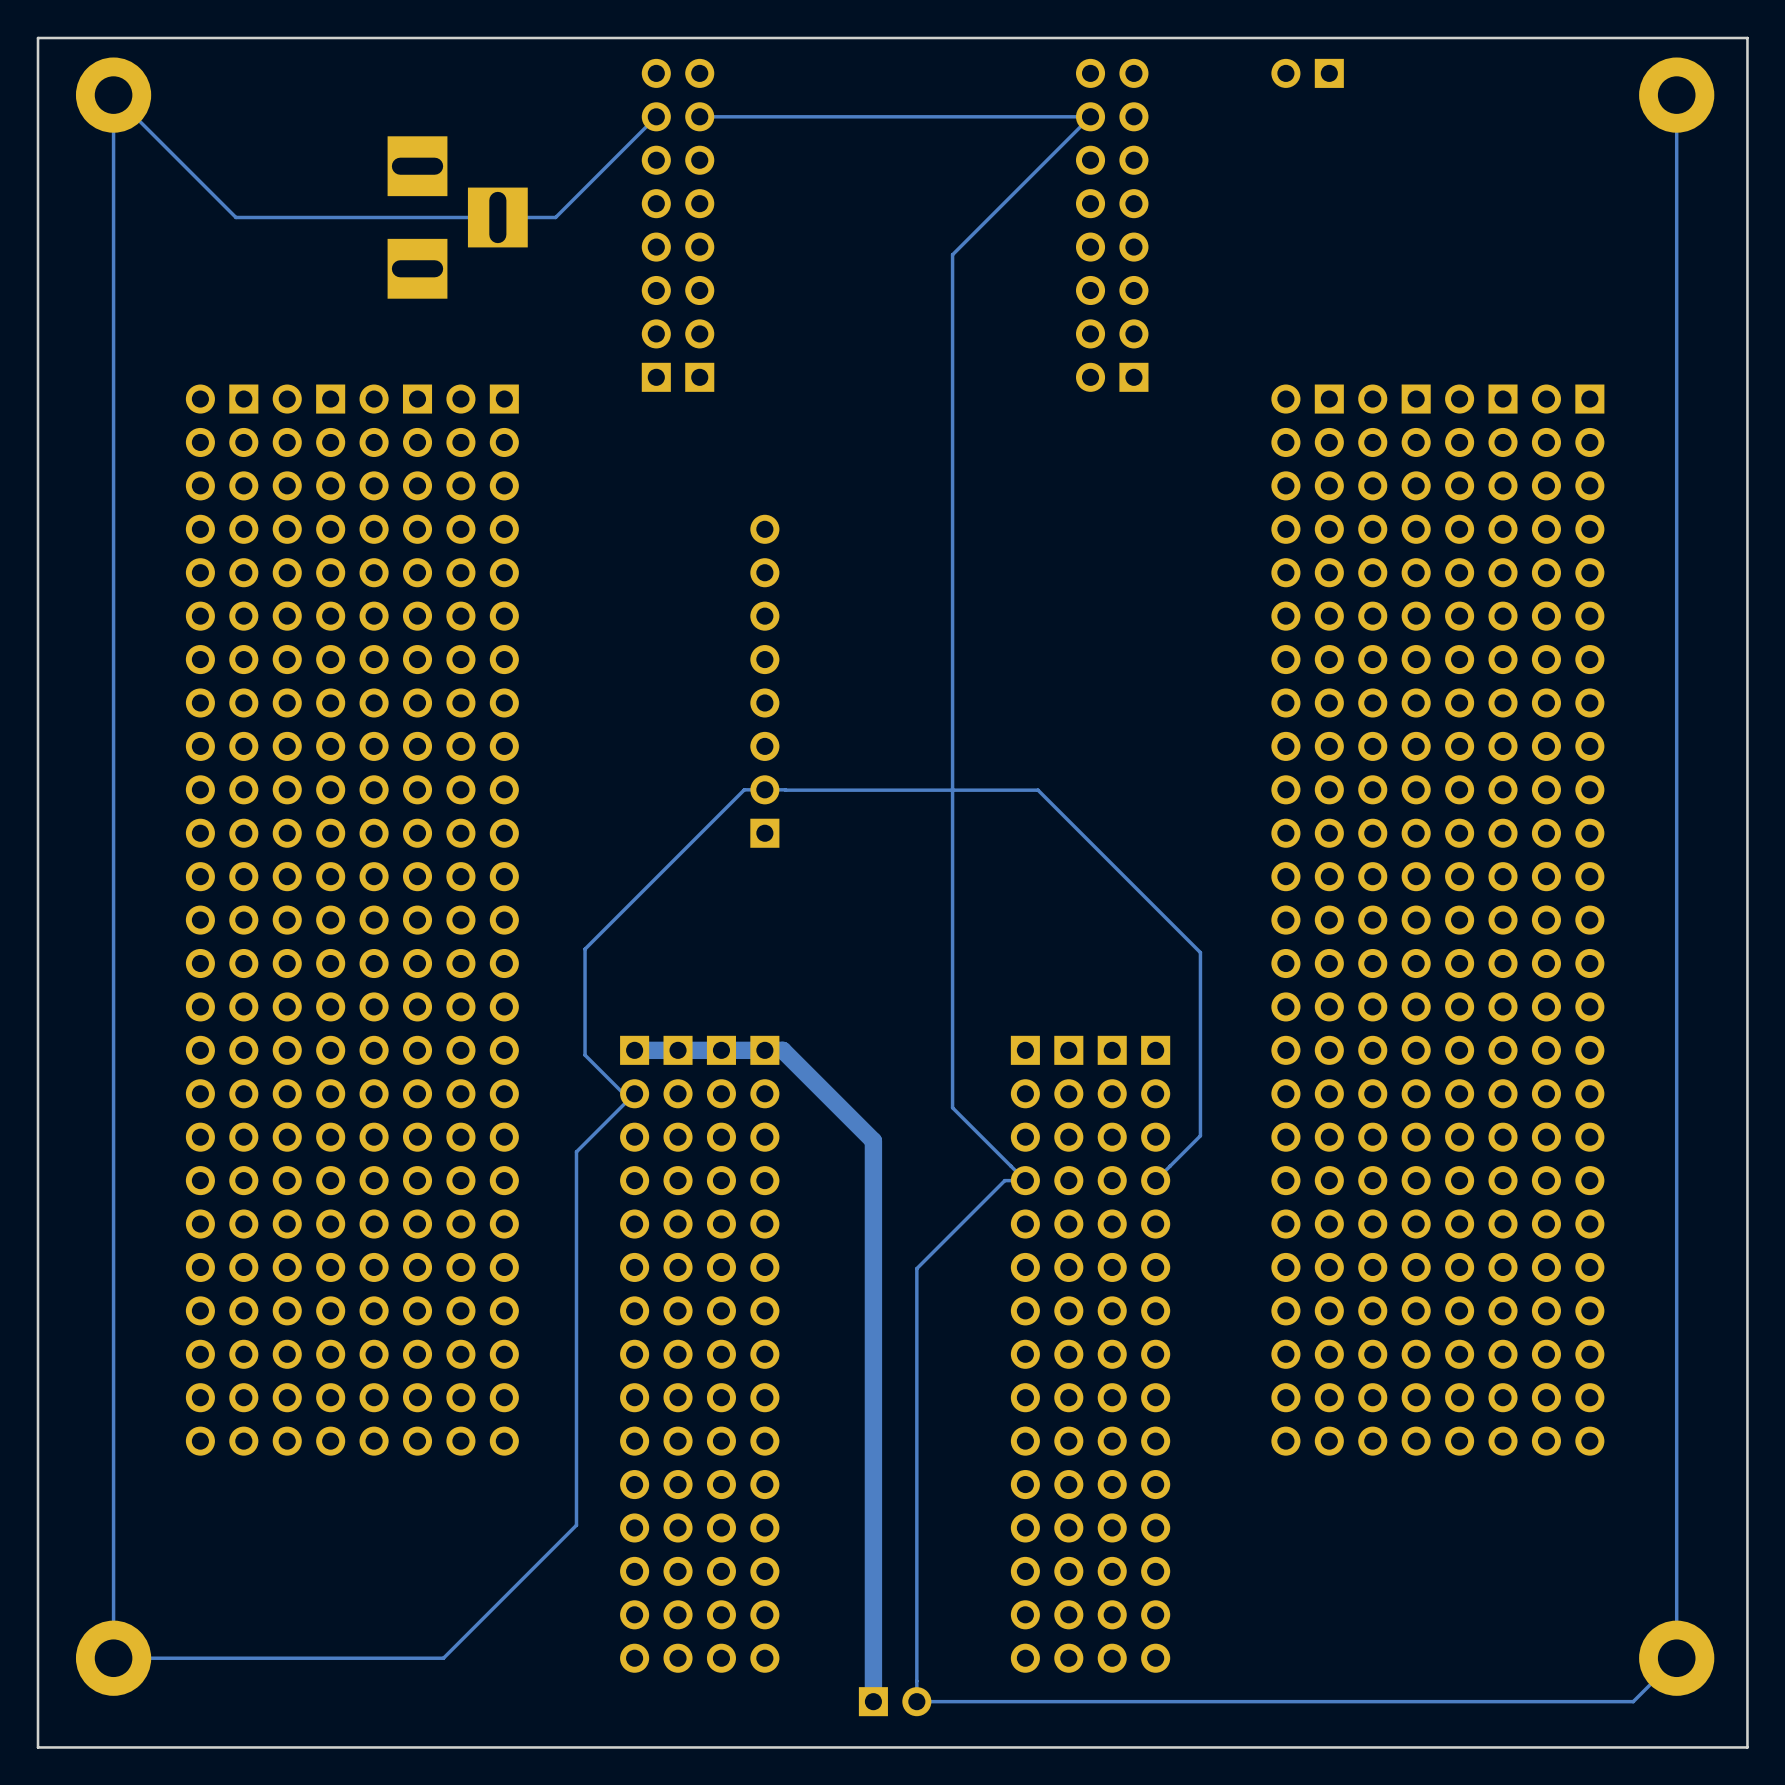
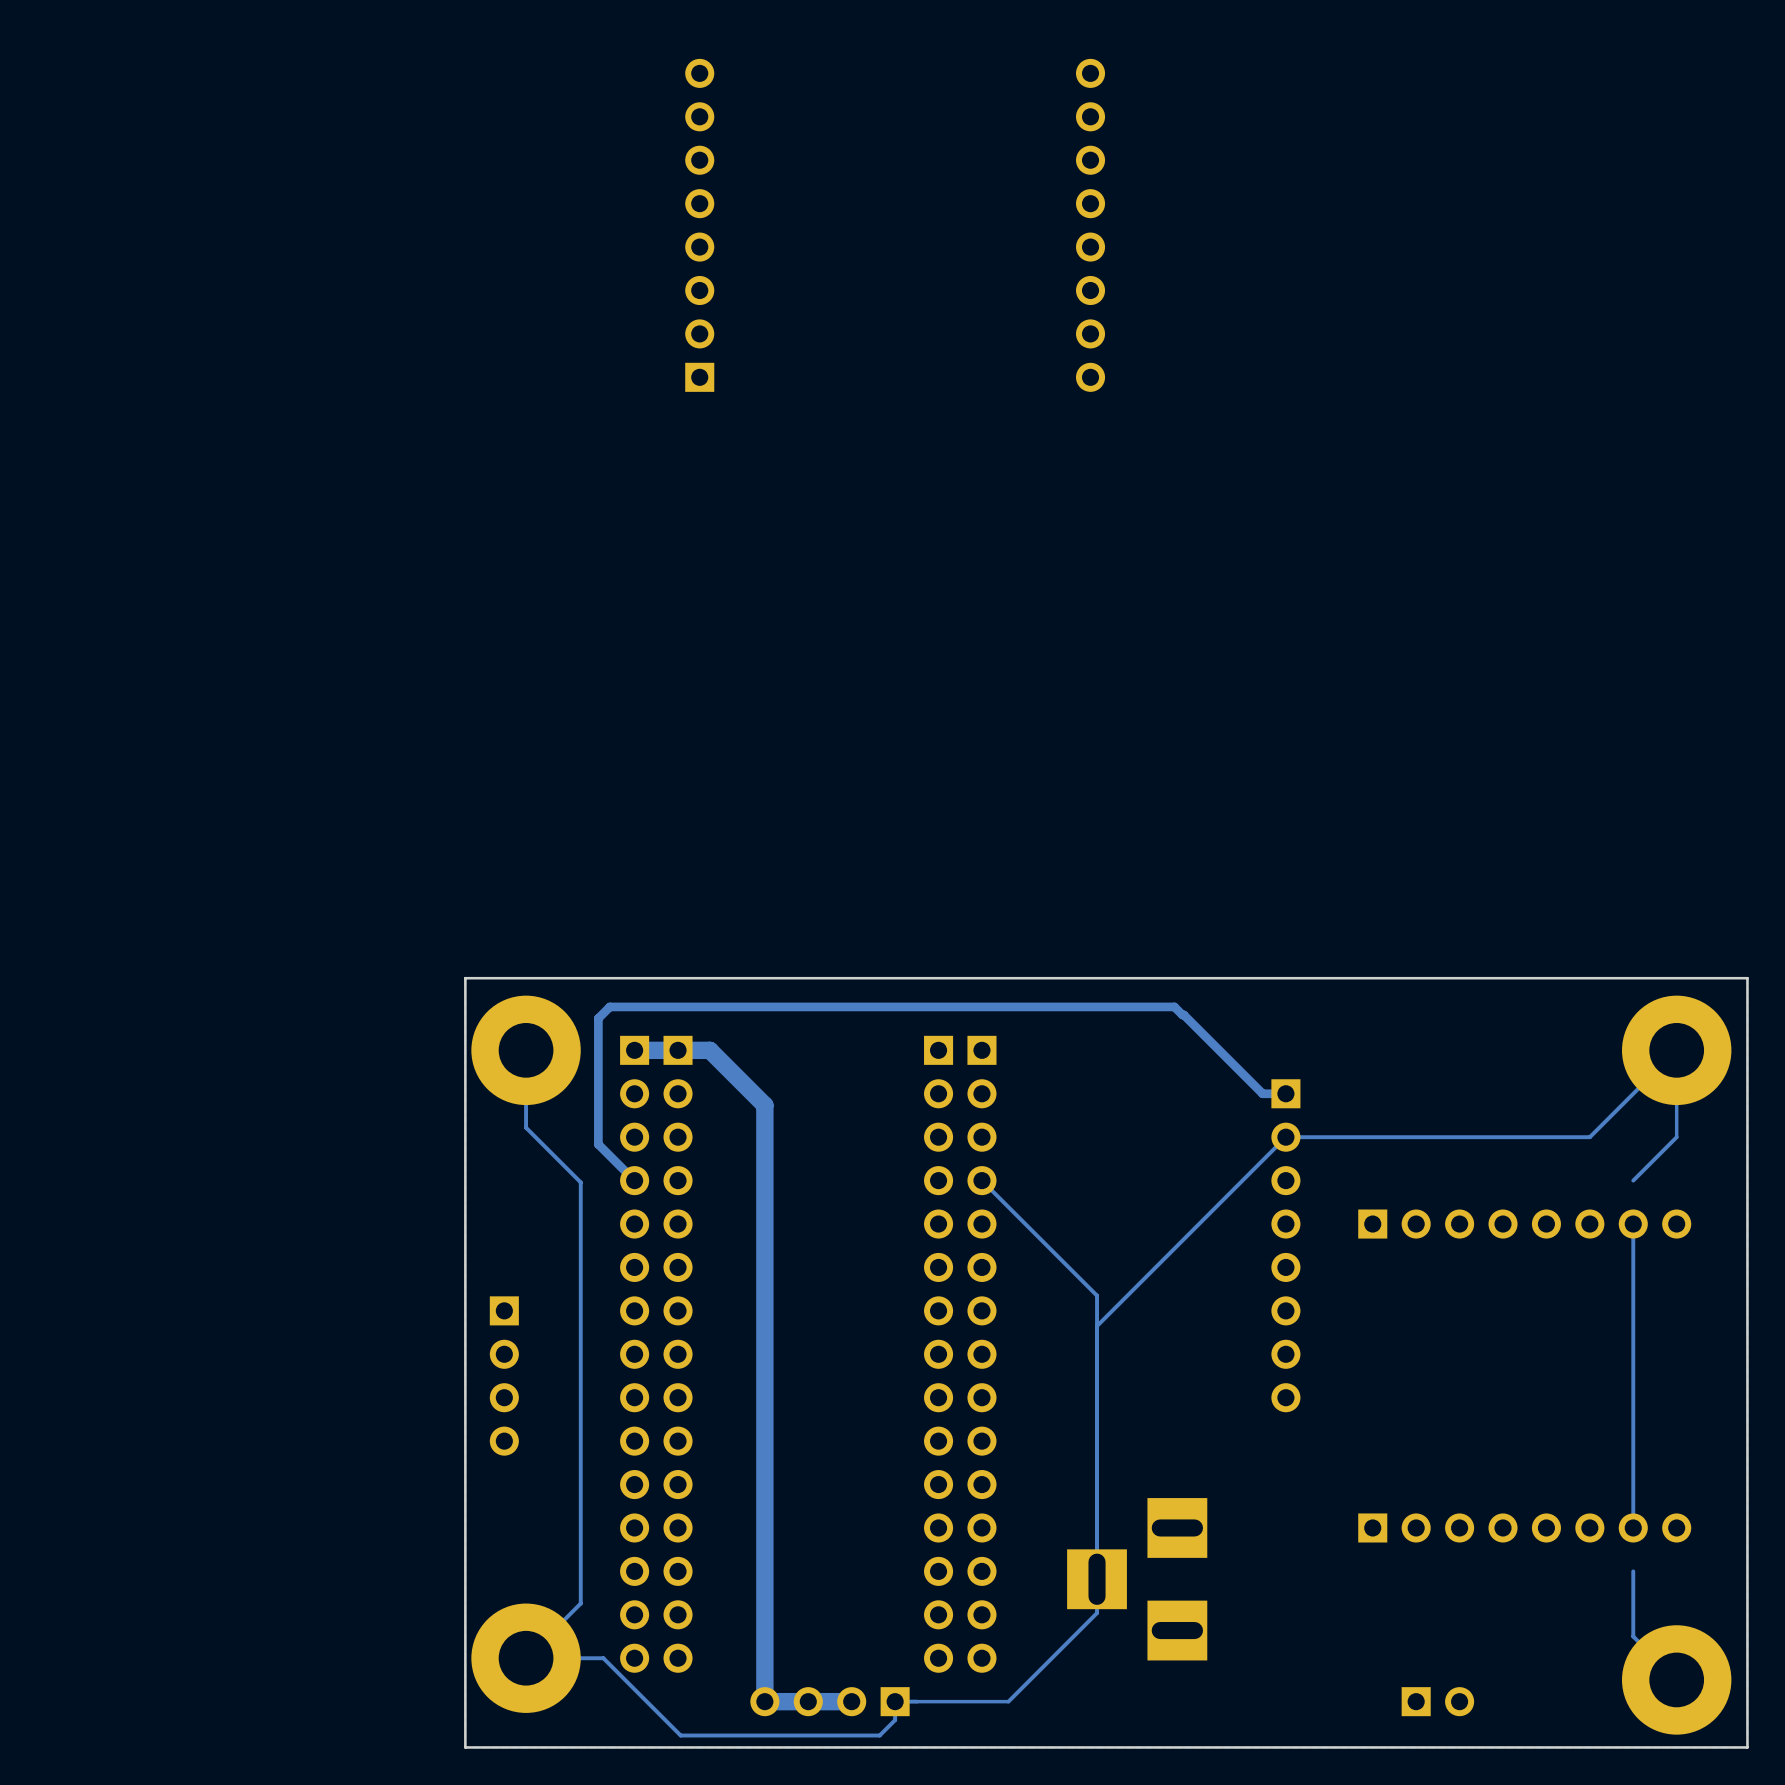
part: (1307, 73) -> none
part: (113, 95) -> none
track: (1676, 95) (1676, 1050) -> (1097, 1326) (1285, 1137) (1589, 1137) (1676, 1050)
part: (1676, 95) -> none
track: (656, 116) (555, 217) (235, 217) (113, 95) (113, 1658) (443, 1658) (576, 1525) (576, 1151) (634, 1093) -> none
track: (699, 116) (1090, 116) (952, 254) (952, 1107) (1025, 1180) (1004, 1180) (916, 1268) (916, 1701) -> (526, 1050) (526, 1127) (580, 1182) (580, 1603) (526, 1658) (603, 1658) (680, 1735) (879, 1735) (895, 1720) (895, 1701) (916, 1701)
part: (457, 217) -> none
part: (656, 225) -> none
part: (1133, 225) -> none
part: (764, 681) -> none
part: (222, 920) -> none
part: (308, 920) -> none
part: (395, 920) -> none
part: (482, 920) -> none
part: (1307, 920) -> none
part: (1394, 920) -> none
part: (1481, 920) -> none
part: (1568, 920) -> none
board edge: (1747, 978) (1747, 38) (38, 38) (38, 1747) (465, 1747) -> (1747, 978) (465, 978) (465, 1747)
part: none -> (526, 1050)
track: (709, 1050) (782, 1050) (873, 1140) (873, 1701) -> (709, 1050) (764, 1105) (764, 1701) (851, 1701)
part: none -> (1676, 1050)
track: none -> (1285, 1093) (1262, 1093) (1174, 1006) (609, 1006) (598, 1018) (598, 1144) (634, 1180)
track: (630, 1097) (627, 1097) (585, 1055) (585, 949) (744, 789) (1038, 790) (1200, 952) (1200, 1135) (1155, 1180) -> none
track: (1676, 1137) (1676, 1658) (1633, 1701) (1008, 1701) -> (981, 1180) (1097, 1295) (1097, 1613) (1008, 1701)
track: none -> (1676, 1137) (1633, 1180)
part: none -> (1524, 1224)
track: none -> (1633, 1224) (1633, 1527)
part: none -> (1285, 1245)
part: (721, 1354) -> none
part: (764, 1354) -> none
part: none -> (938, 1354)
part: none -> (981, 1354)
part: (1025, 1354) -> none
part: (1068, 1354) -> none
part: (1112, 1354) -> none
part: (1155, 1354) -> none
part: none -> (504, 1376)
part: none -> (1524, 1527)
track: none -> (1633, 1571) (1633, 1636) (1676, 1679)
part: none -> (1137, 1579)
part: (113, 1658) -> none
part: none -> (526, 1658)
part: (1676, 1658) -> none
part: none -> (1676, 1679)
part: none -> (830, 1701)
part: (895, 1701) -> none
part: none -> (1437, 1701)

